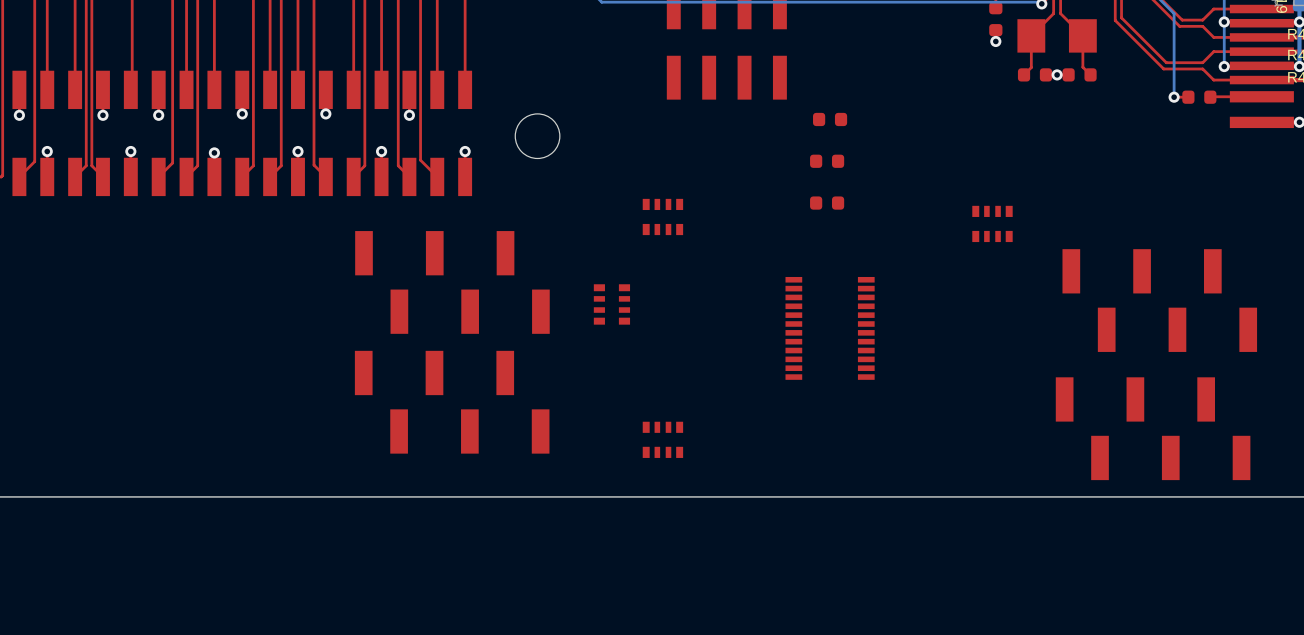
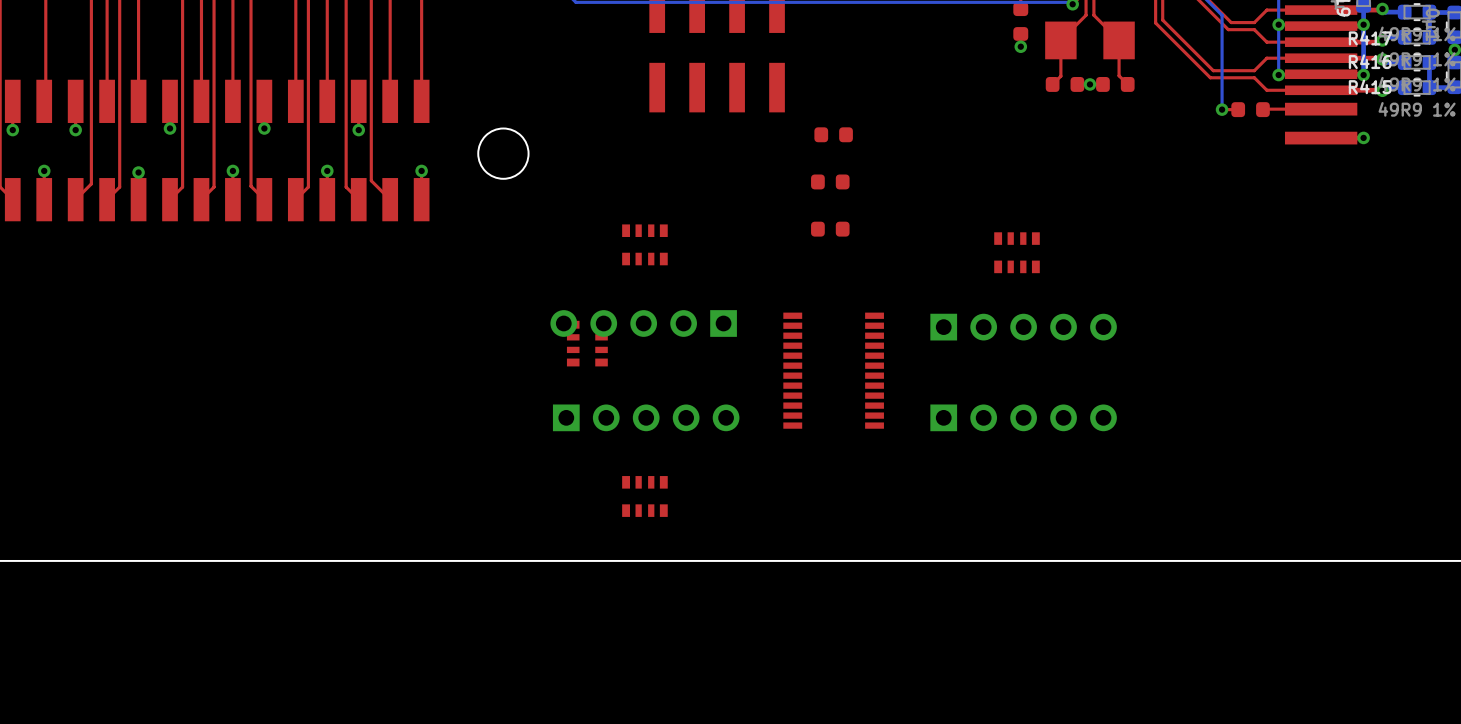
part: (452, 282) -> none
part: none -> (643, 323)
part: none -> (1023, 327)
part: (1159, 300) -> none
part: none -> (646, 417)
part: none -> (1023, 417)
part: (452, 402) -> none
part: (1153, 428) -> none

